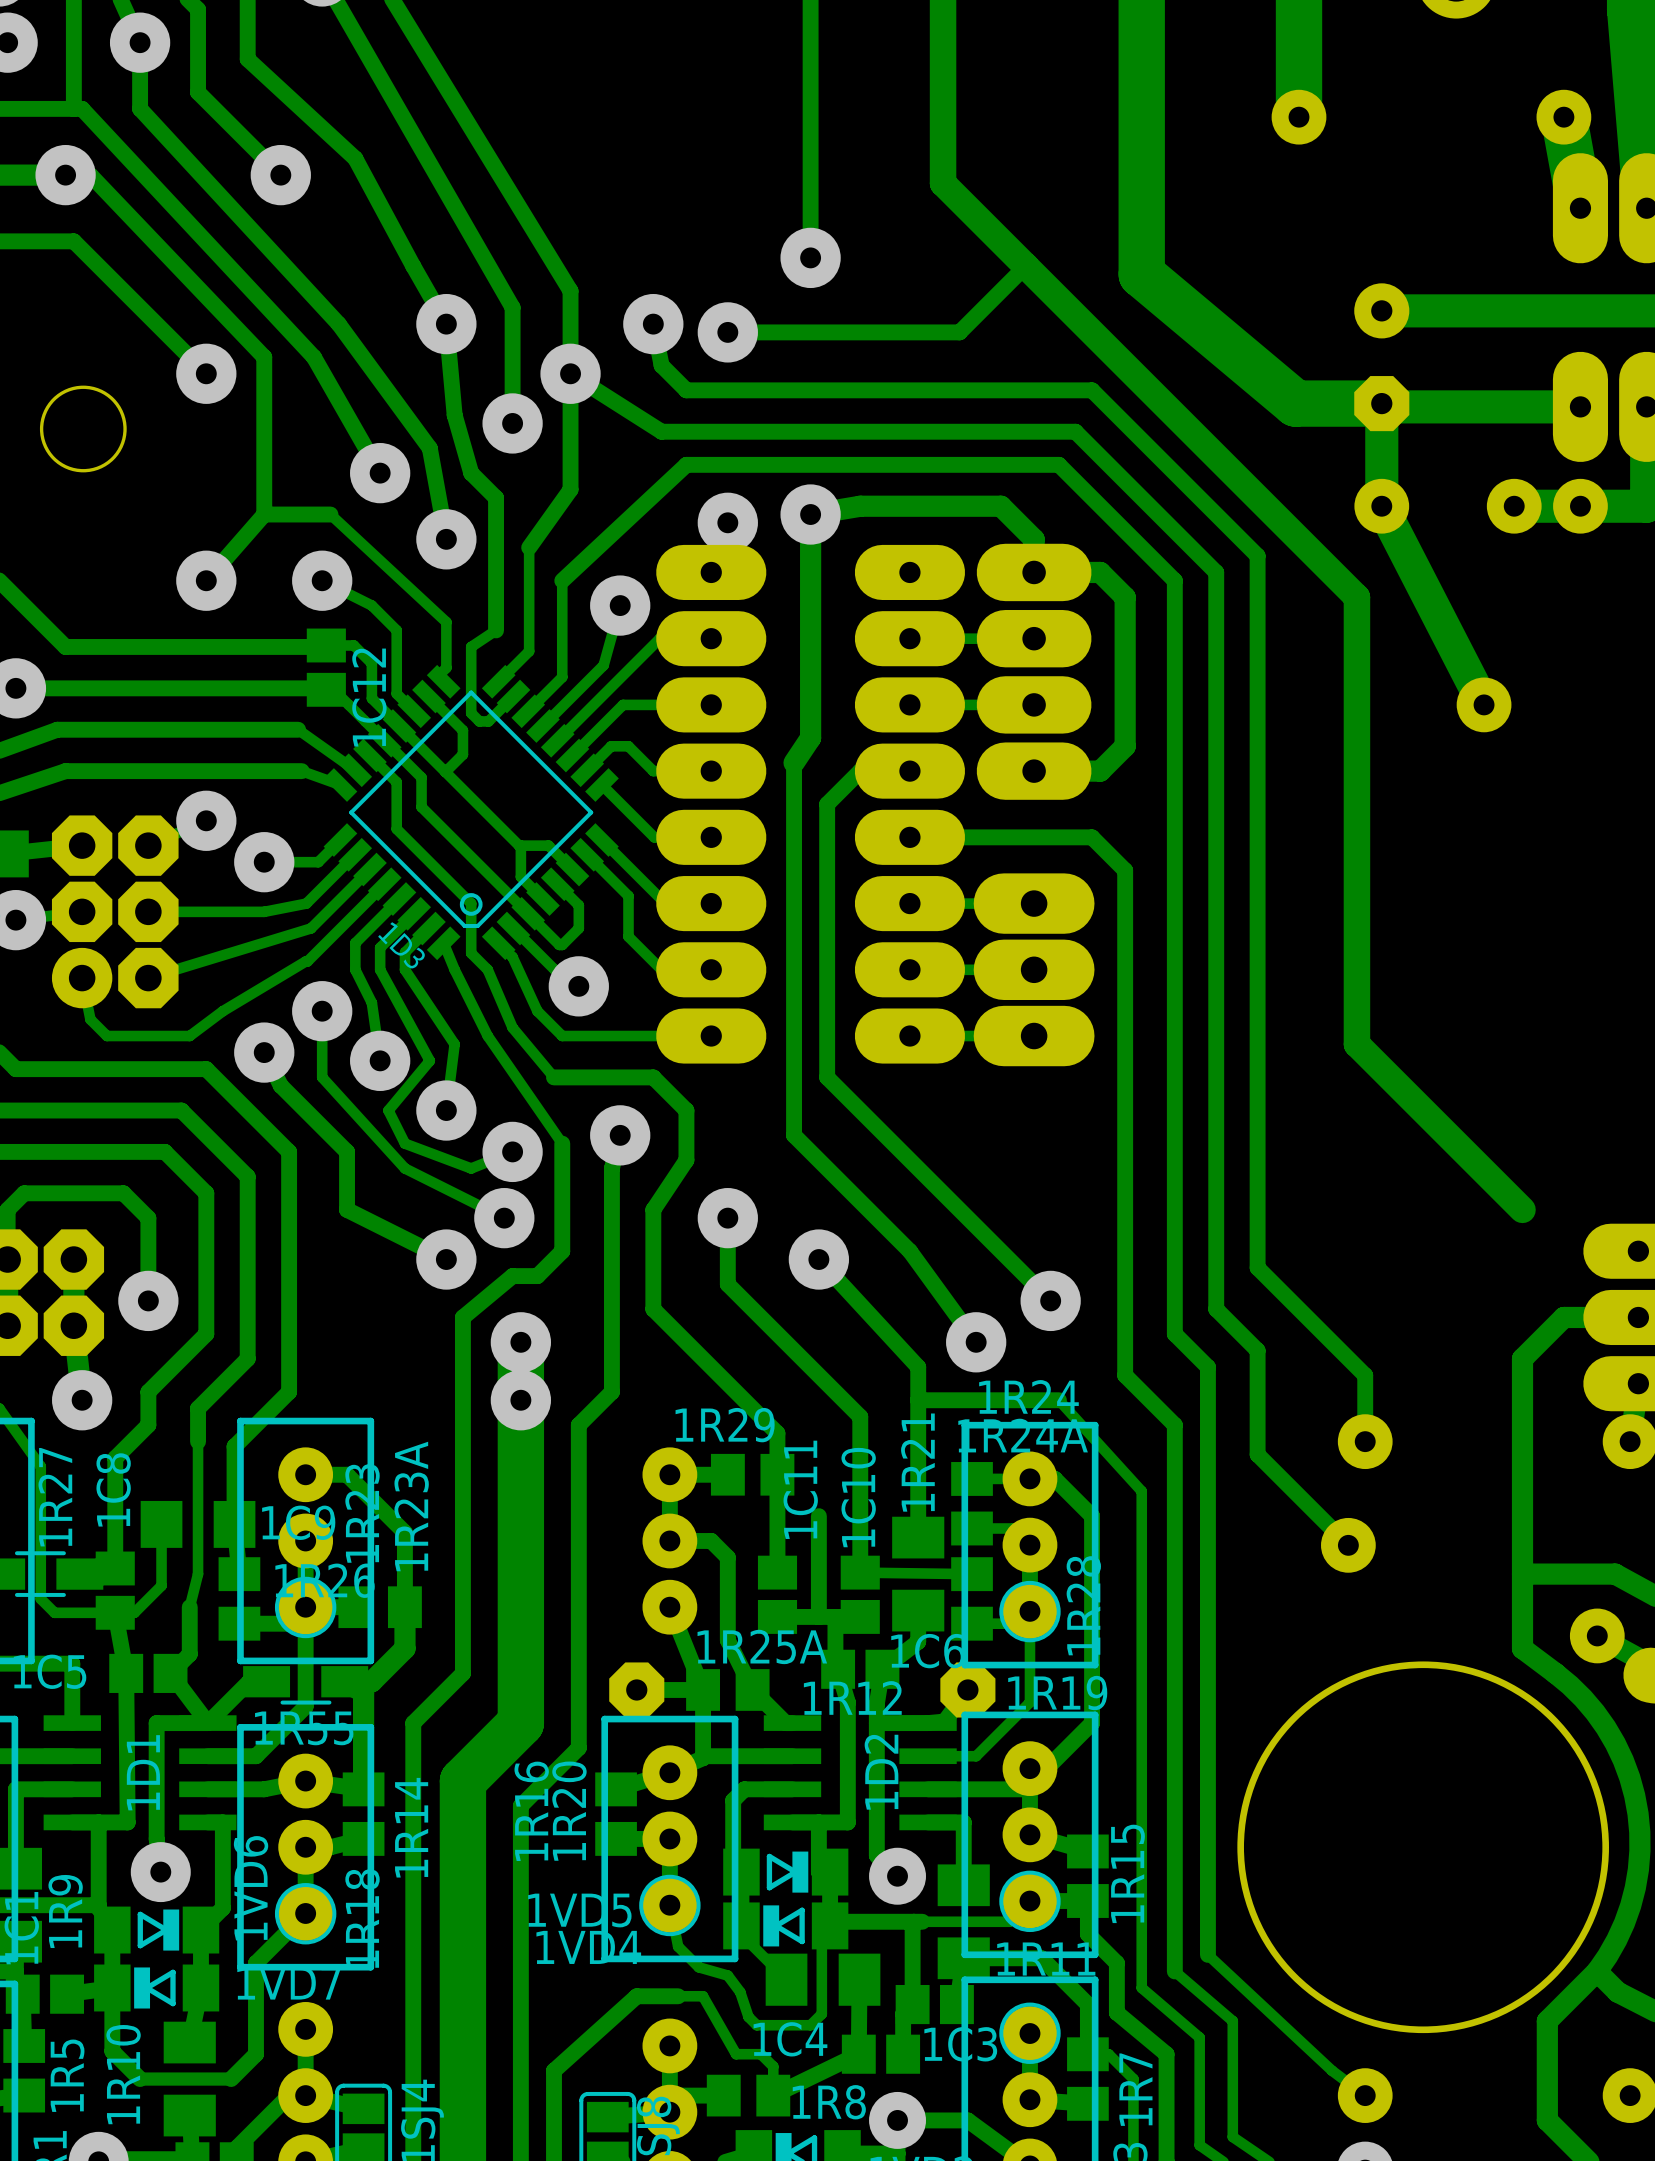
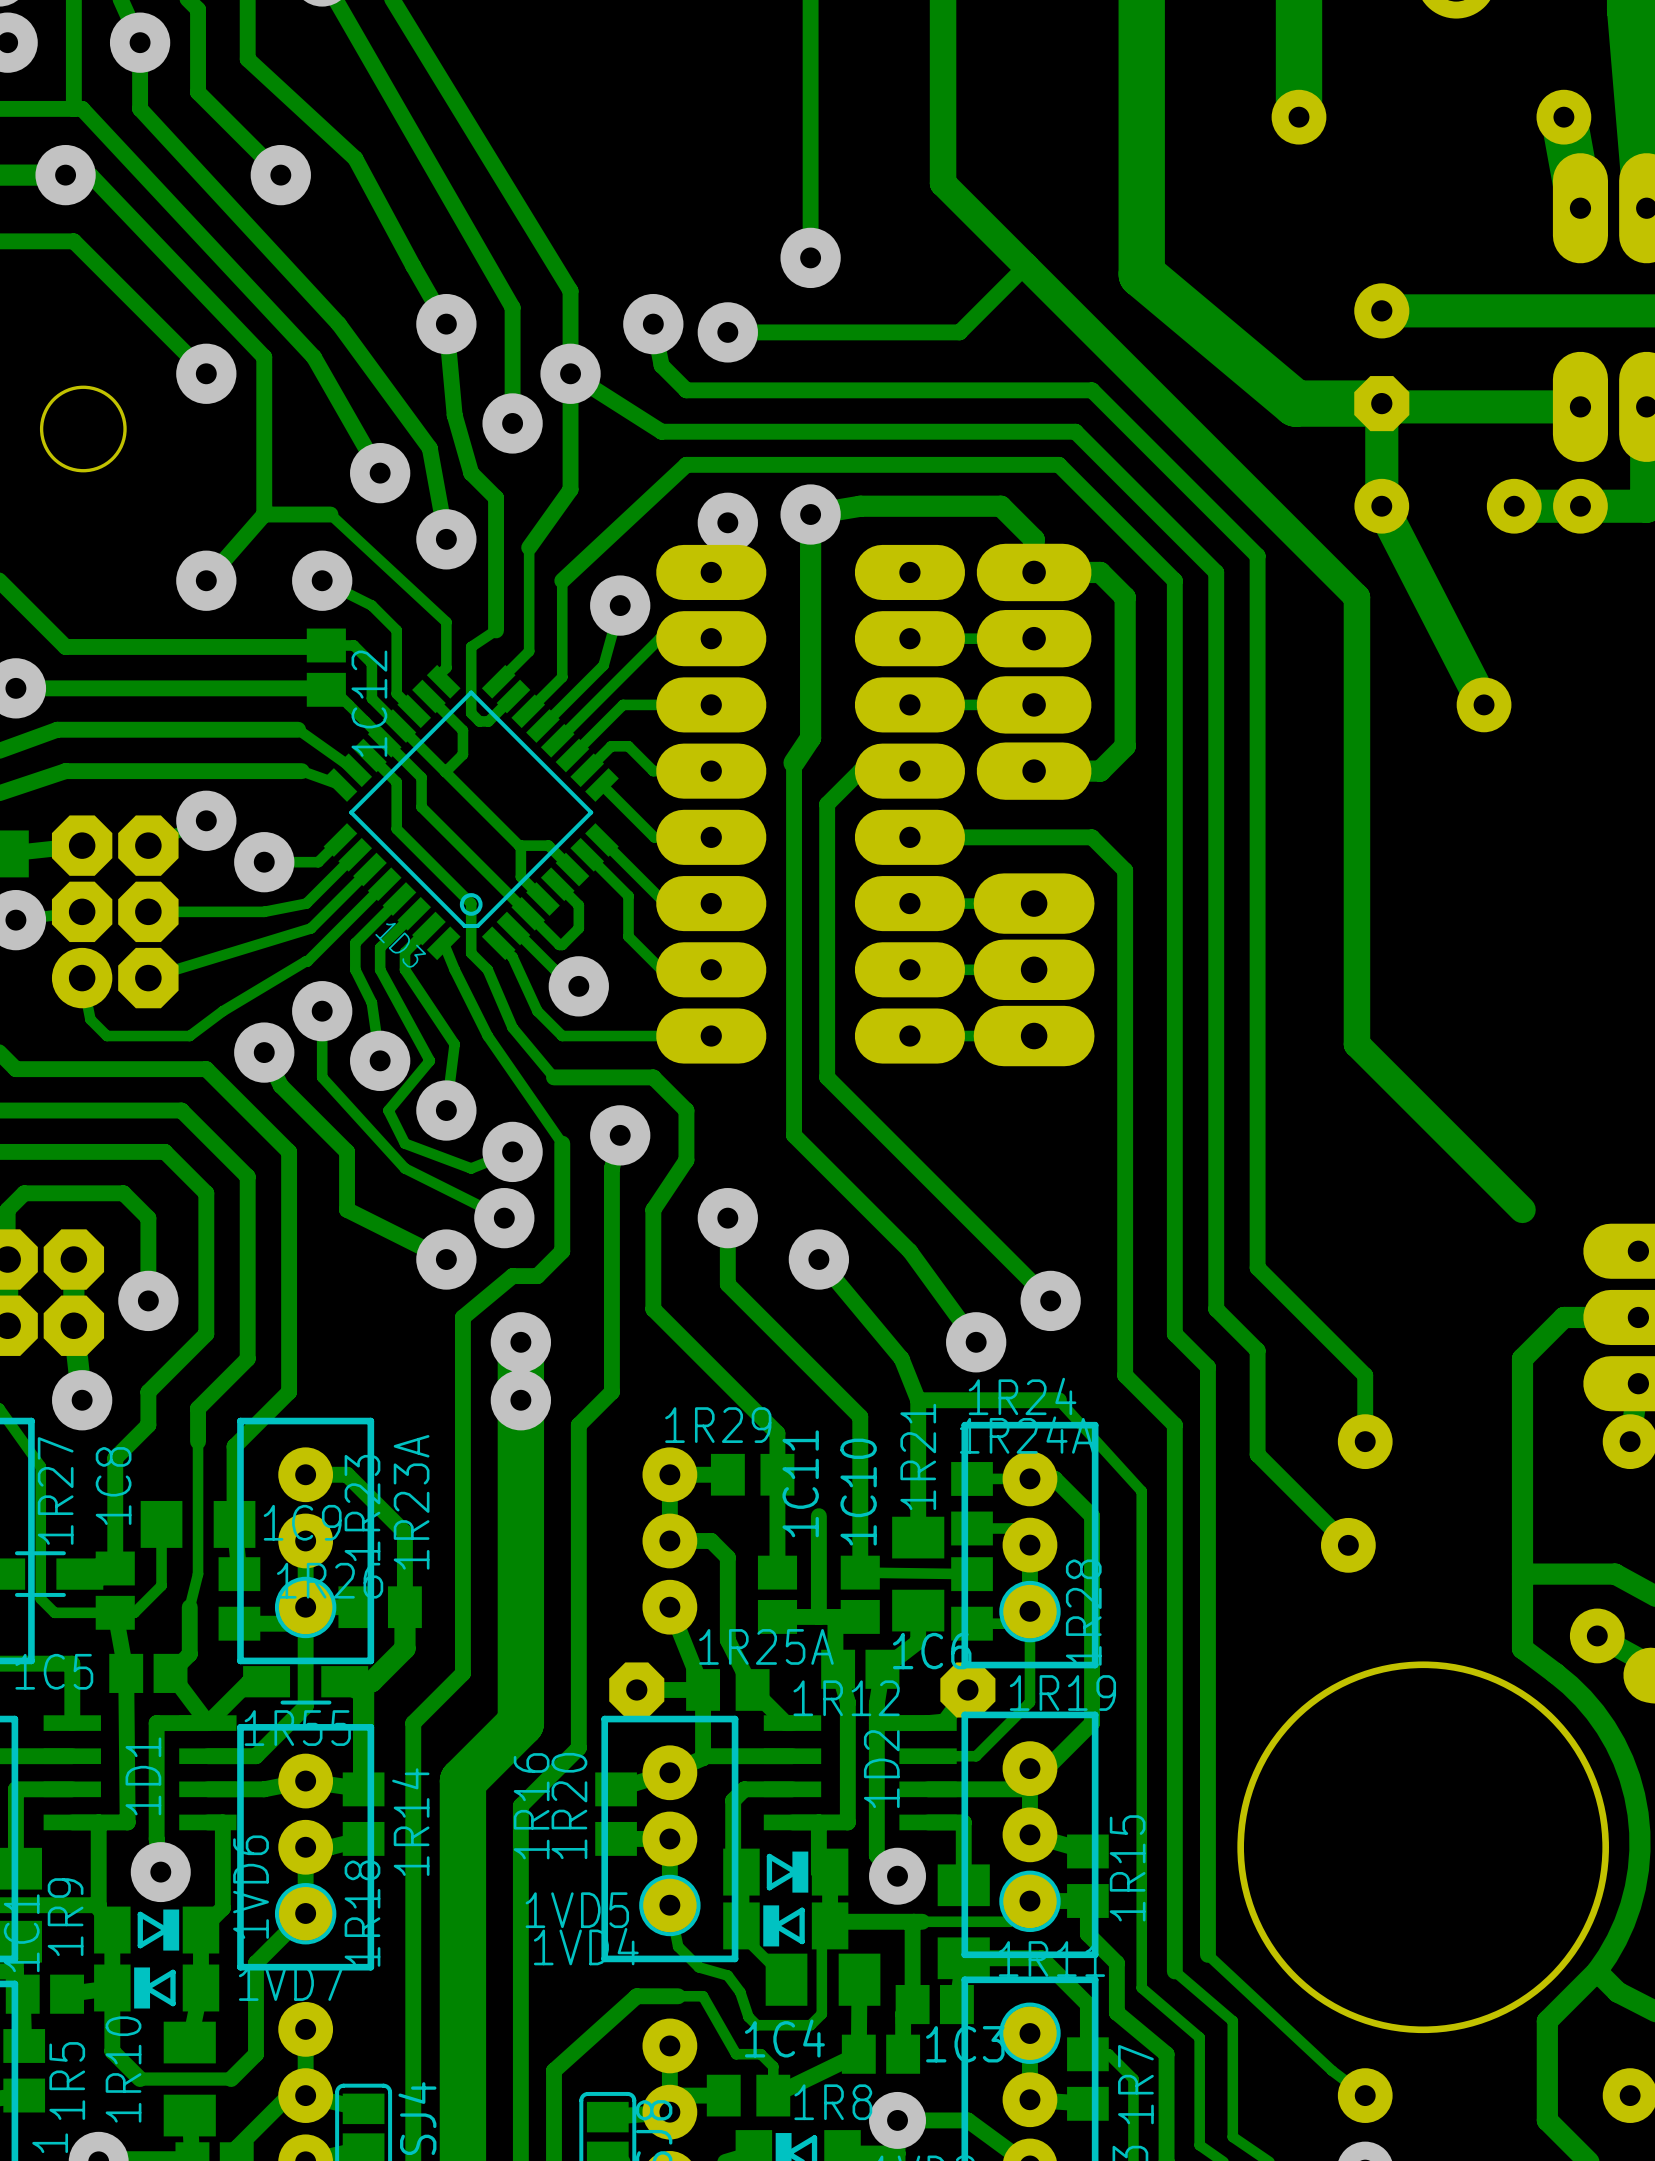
track: (818, 1259) (918, 1367) (918, 1400) -> (818, 1259) (901, 1358) (918, 1400)

